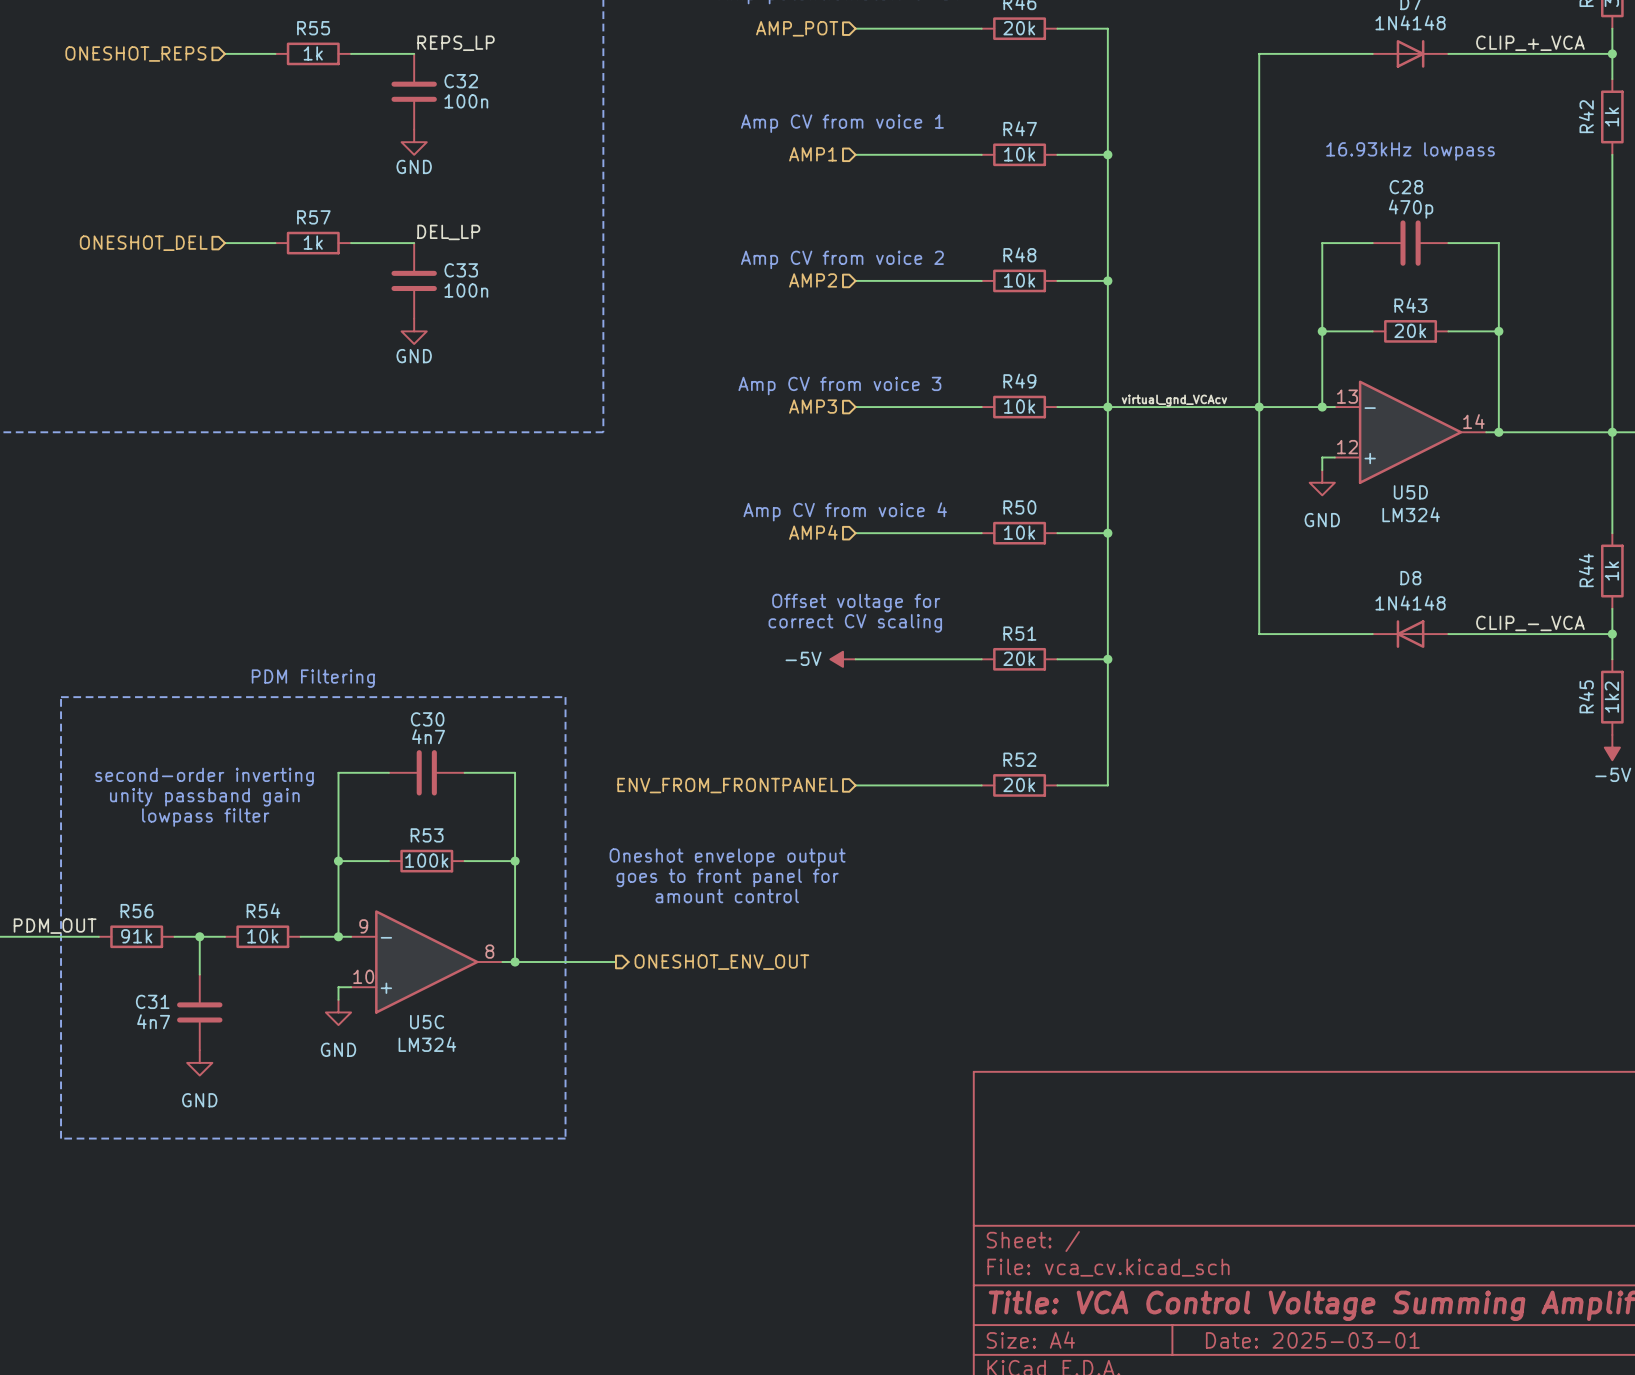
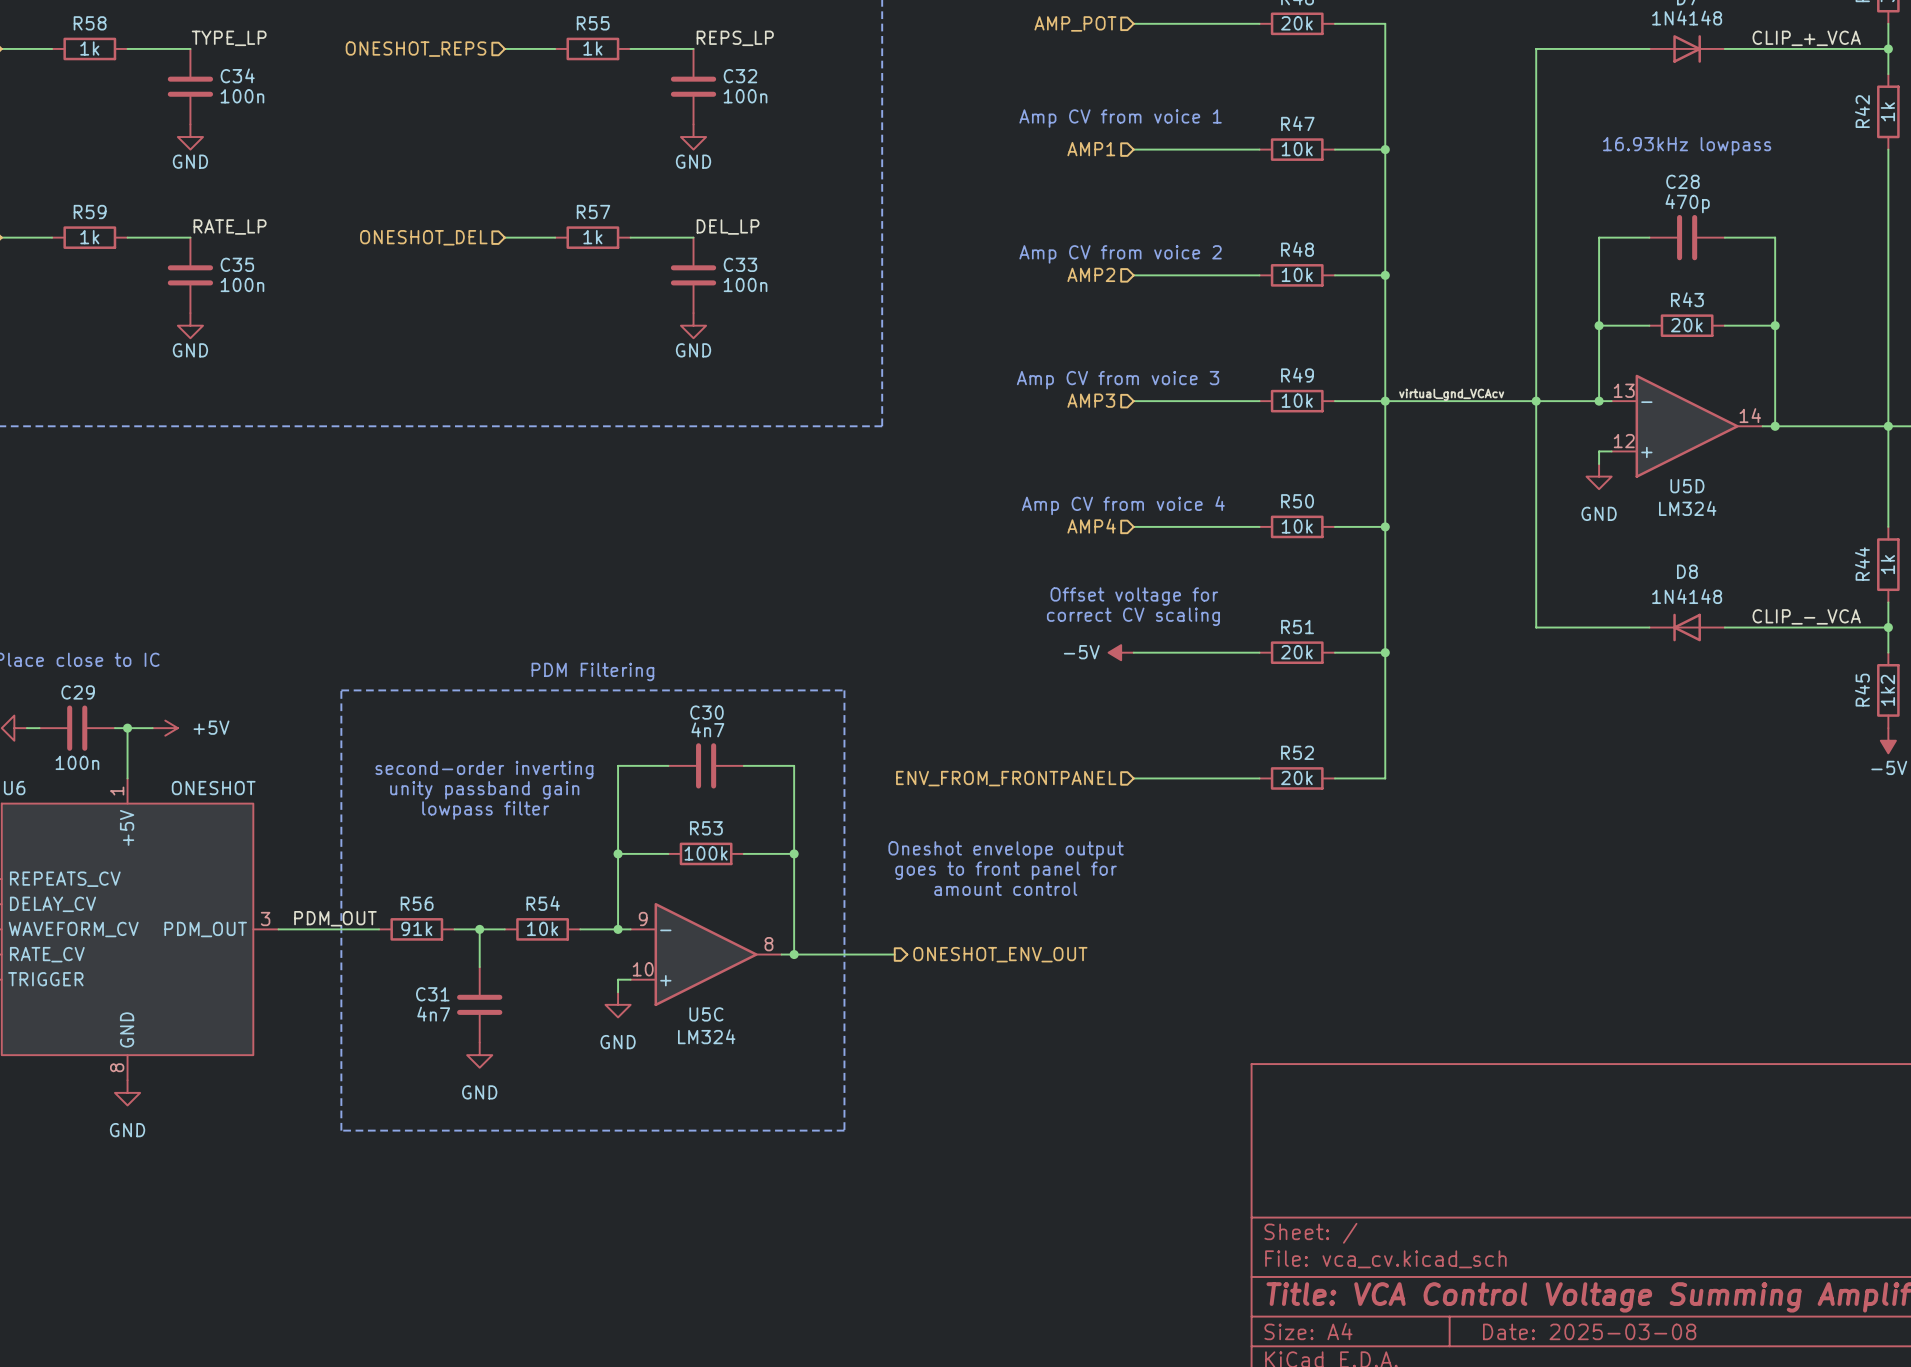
title block: Date: 2025-03-01 (1312, 1340) -> Date: 2025-03-08 (1589, 1331)

